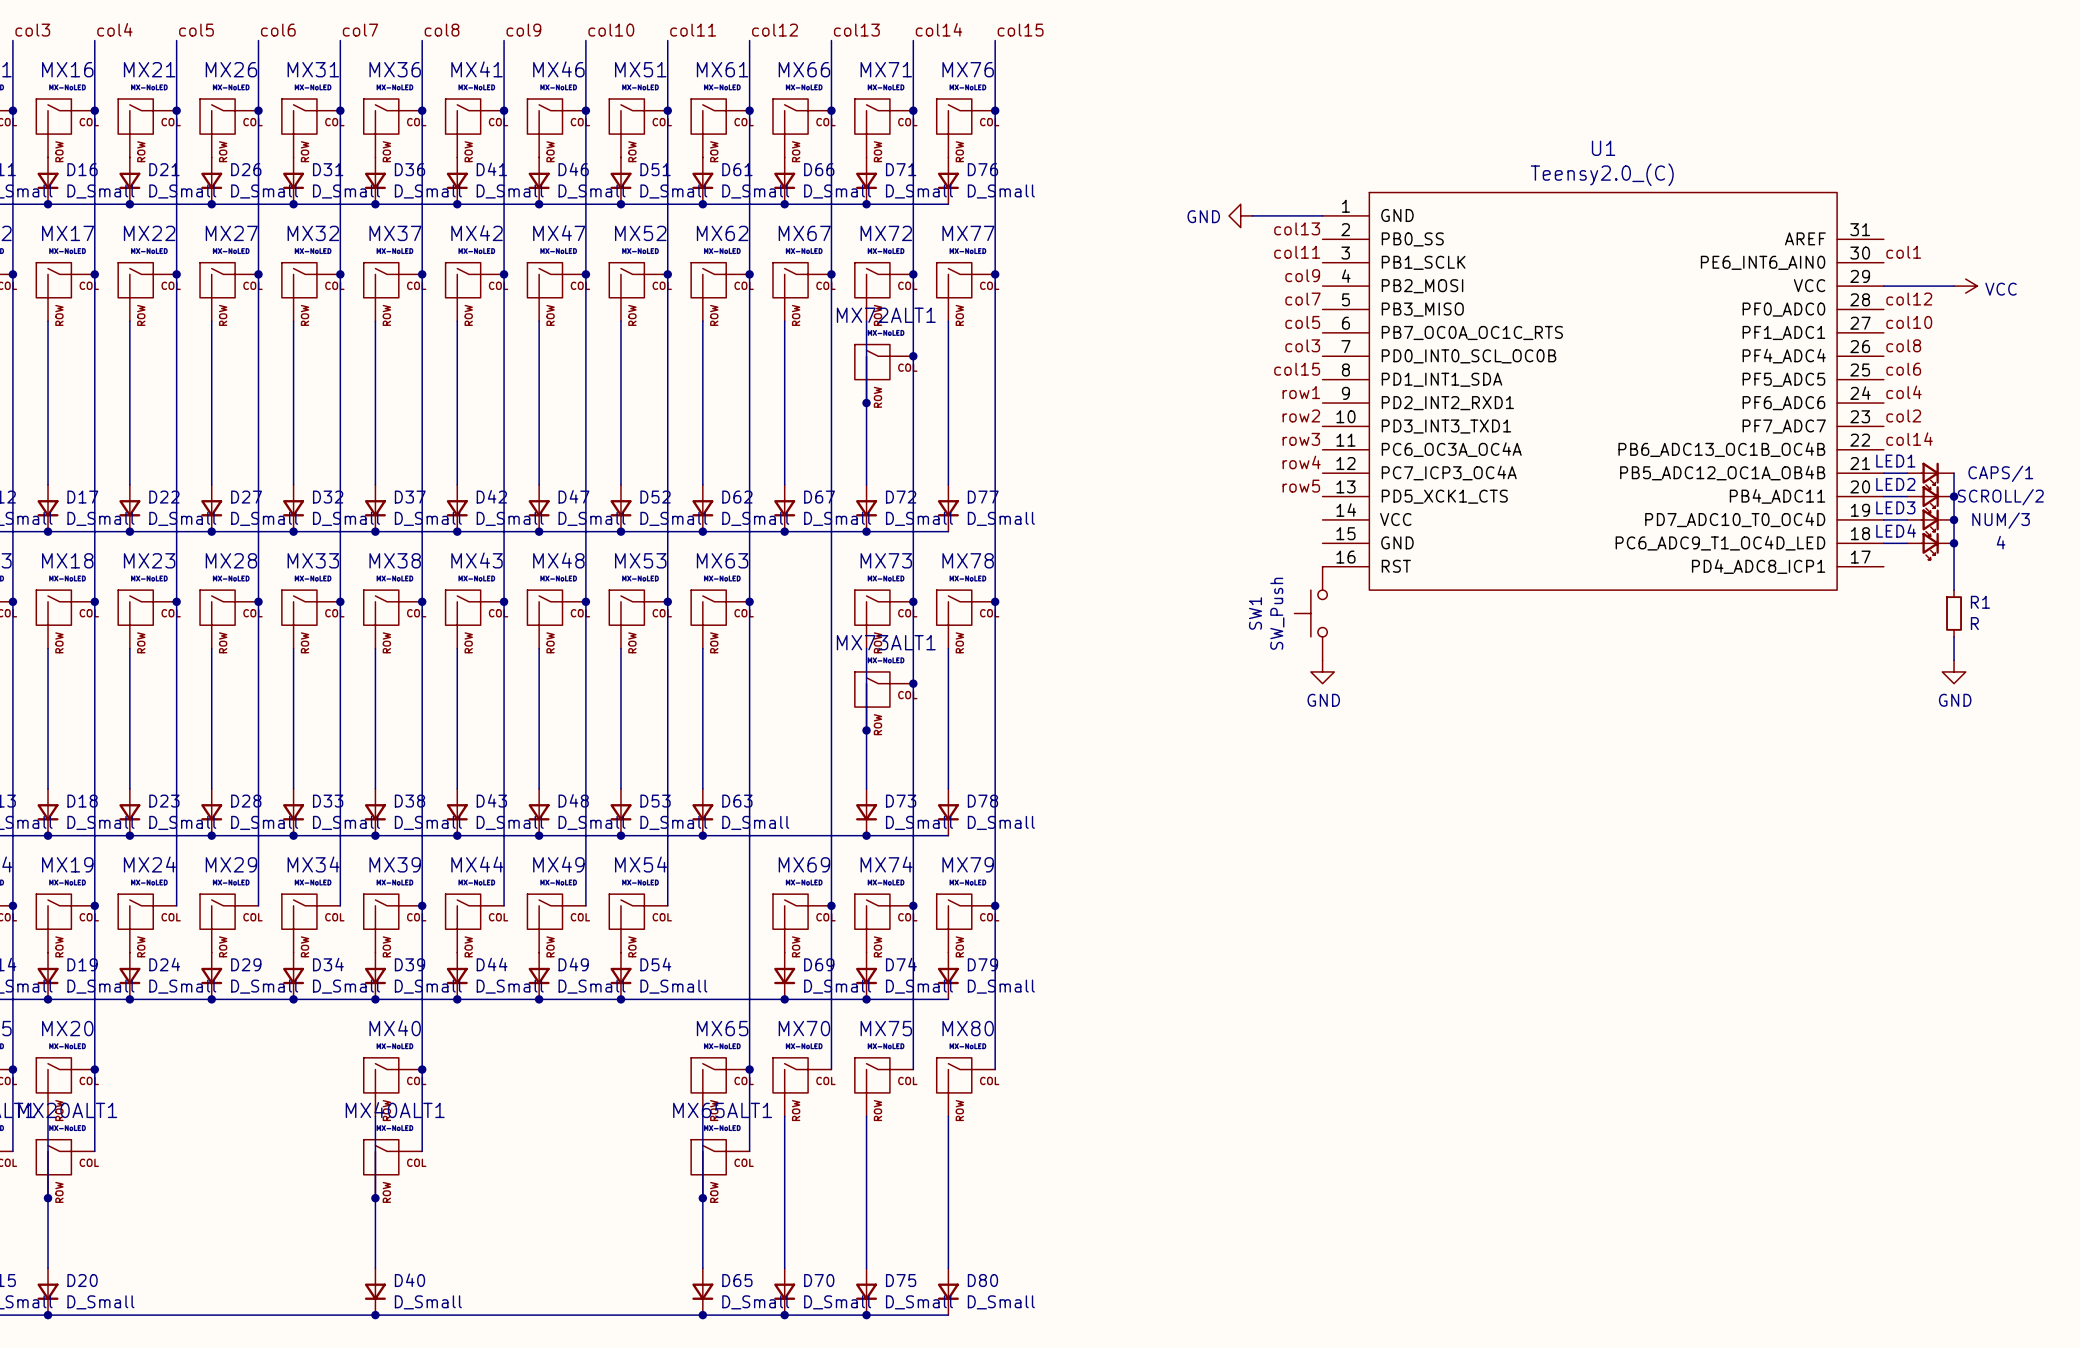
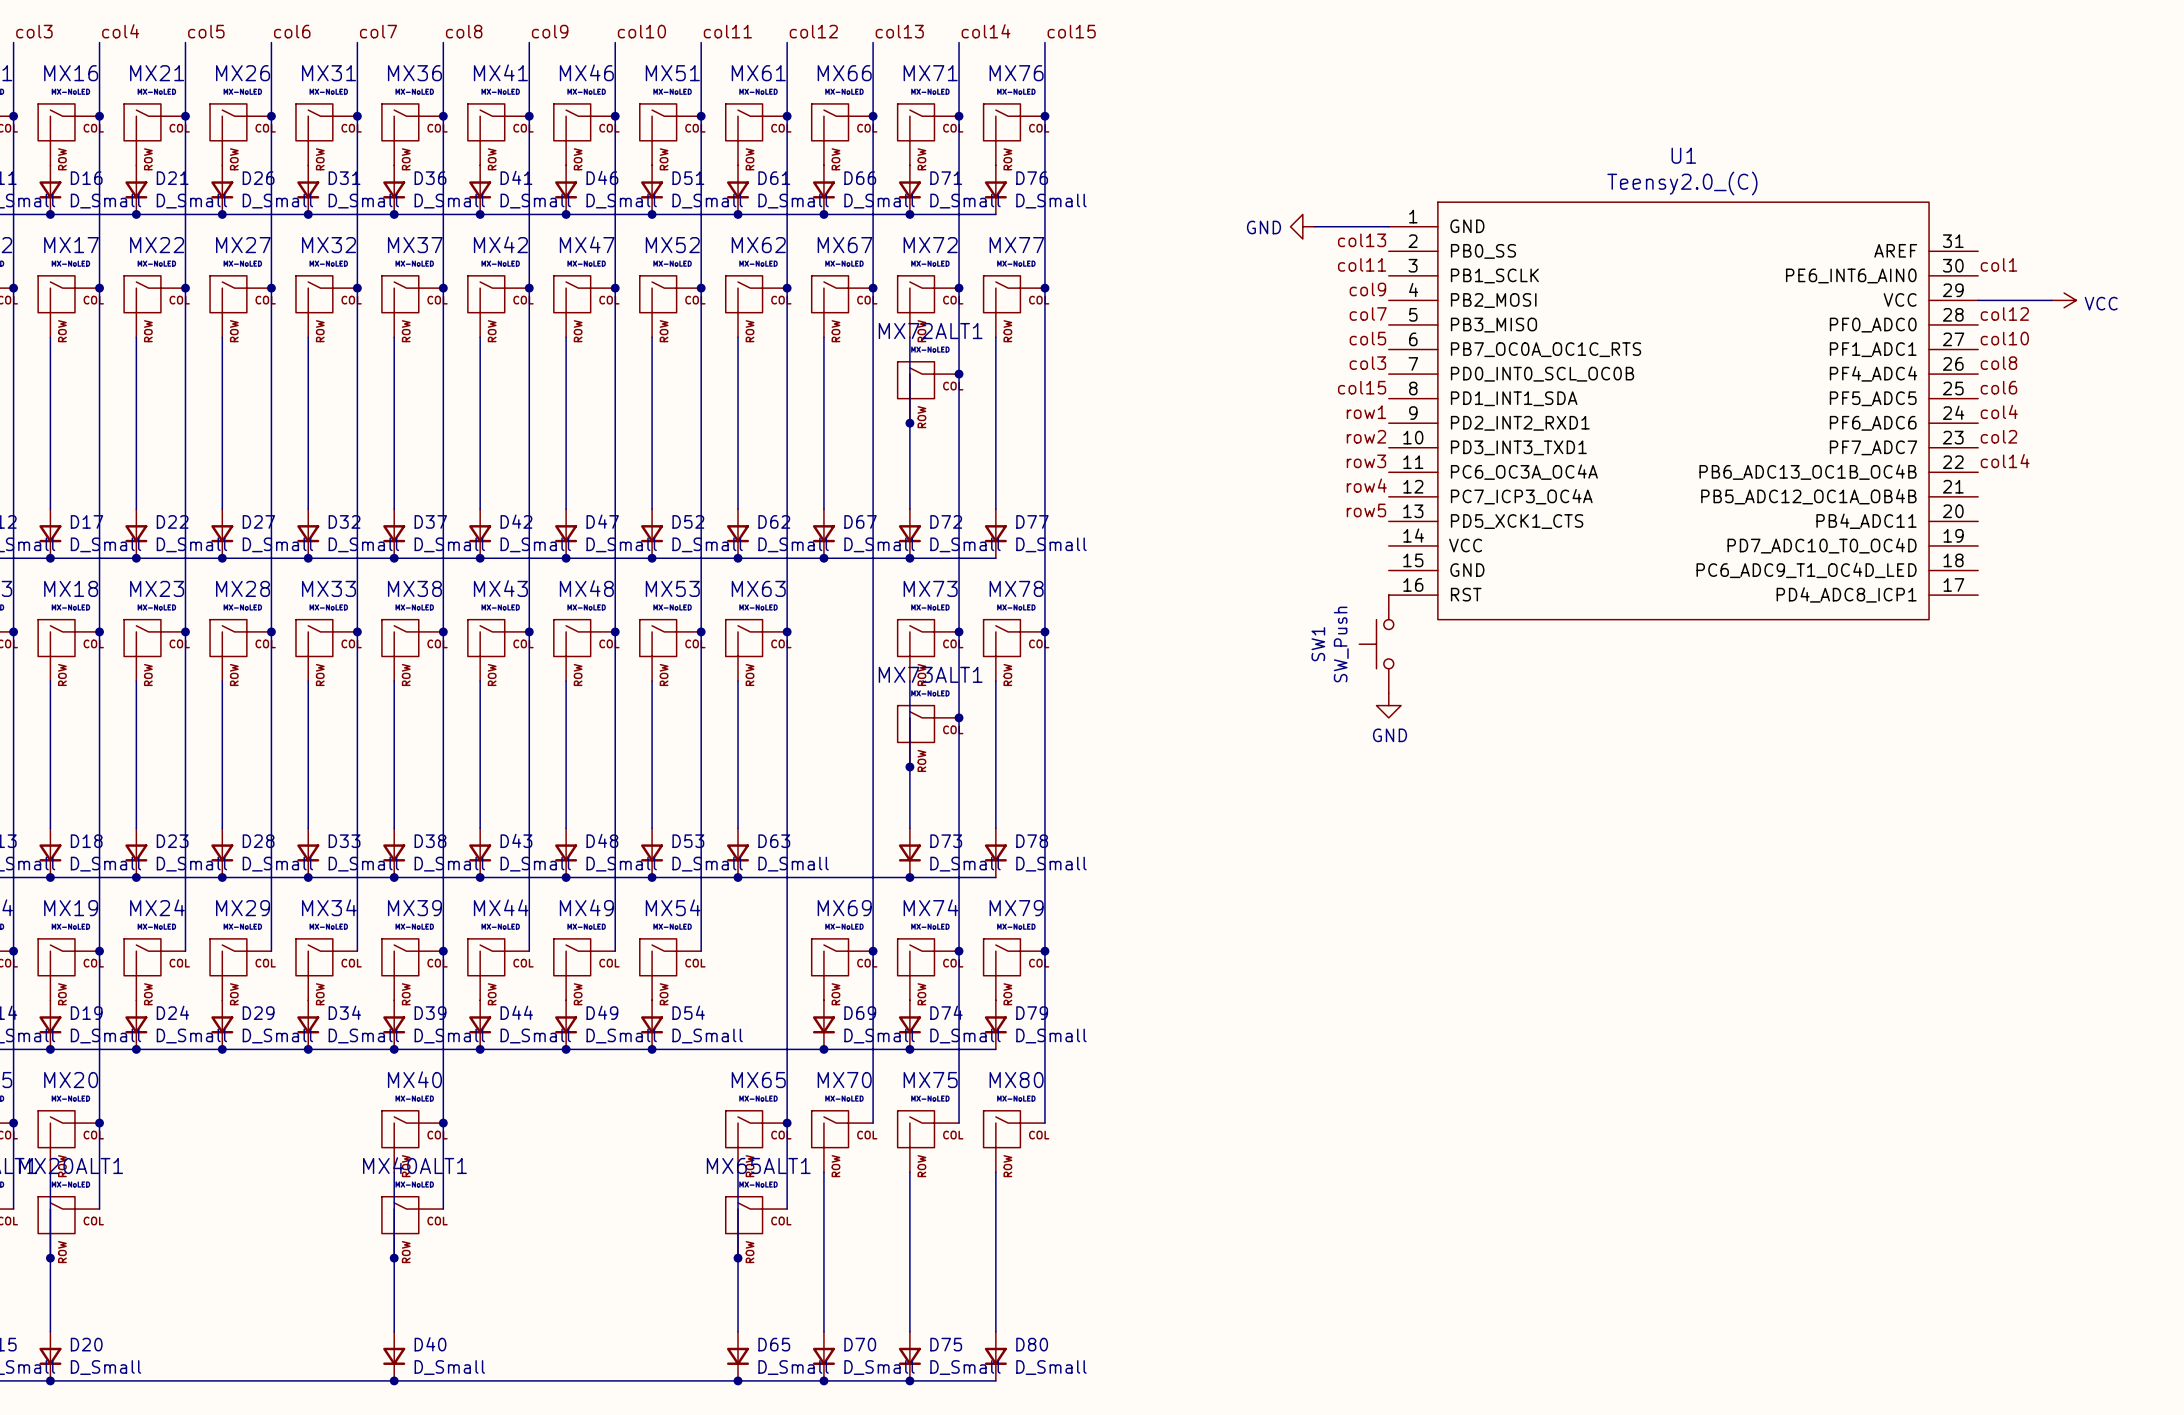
wire: (1883, 473) (1907, 473) -> none
wire: (1954, 473) (1954, 590) -> none
LED1: CAPS/1 (1930, 476) -> none
wire: (1883, 496) (1907, 496) -> none
junction: (1954, 496) -> none
LED2: SCROLL/2 (1930, 499) -> none
wire: (1883, 519) (1907, 519) -> none
junction: (1954, 519) -> none
LED3: NUM/3 (1930, 522) -> none
wire: (1883, 543) (1907, 543) -> none
junction: (1954, 543) -> none
LED4: 4 (1930, 546) -> none
R1: R (1954, 613) -> none
wire: (1954, 636) (1954, 660) -> none
power symbol: GND (1954, 671) -> none

